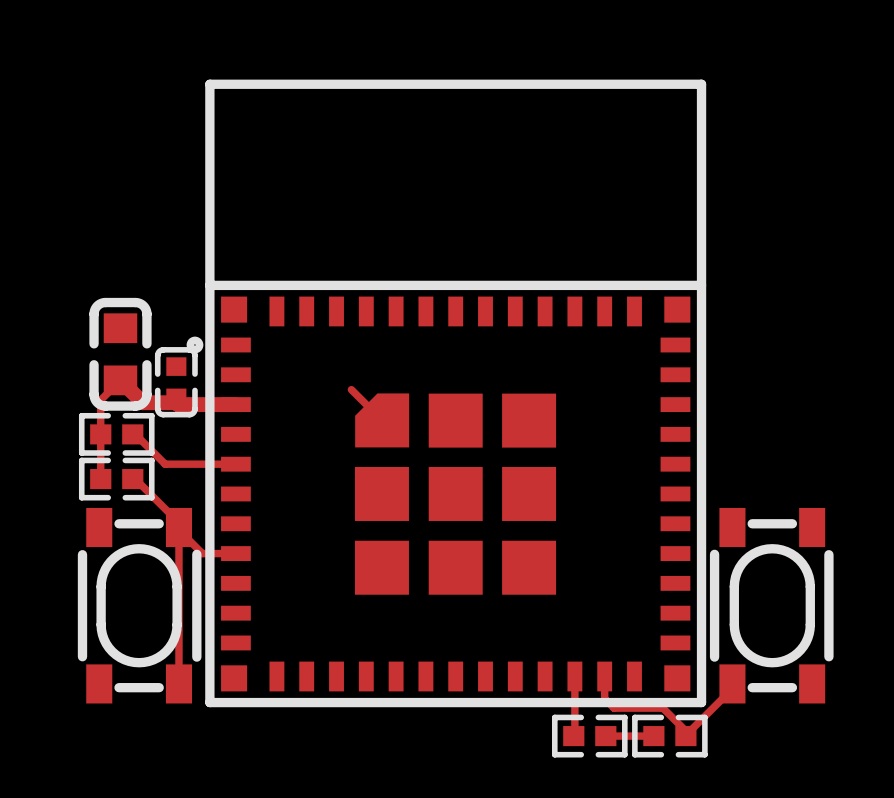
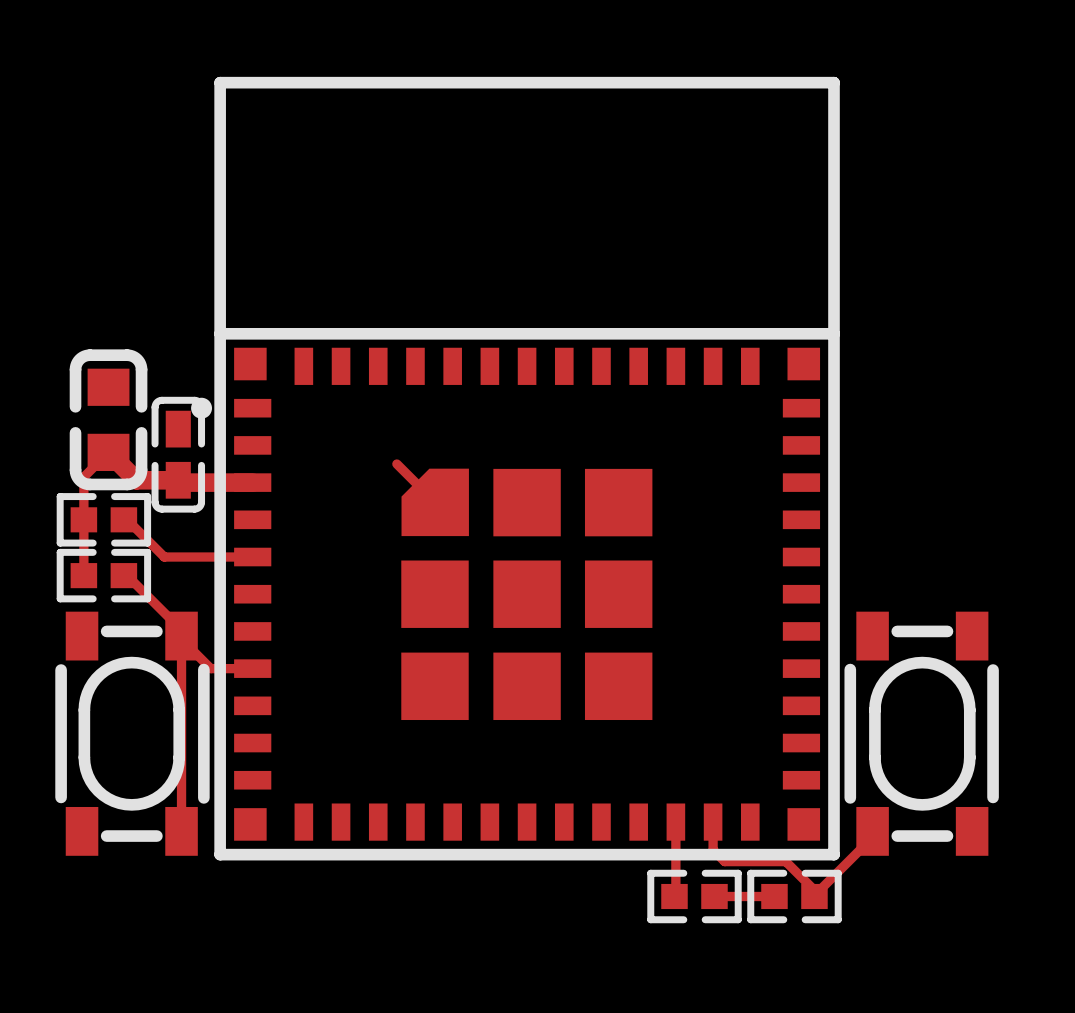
part footprint: [154, 347, 198, 418] -> [151, 396, 206, 513]

